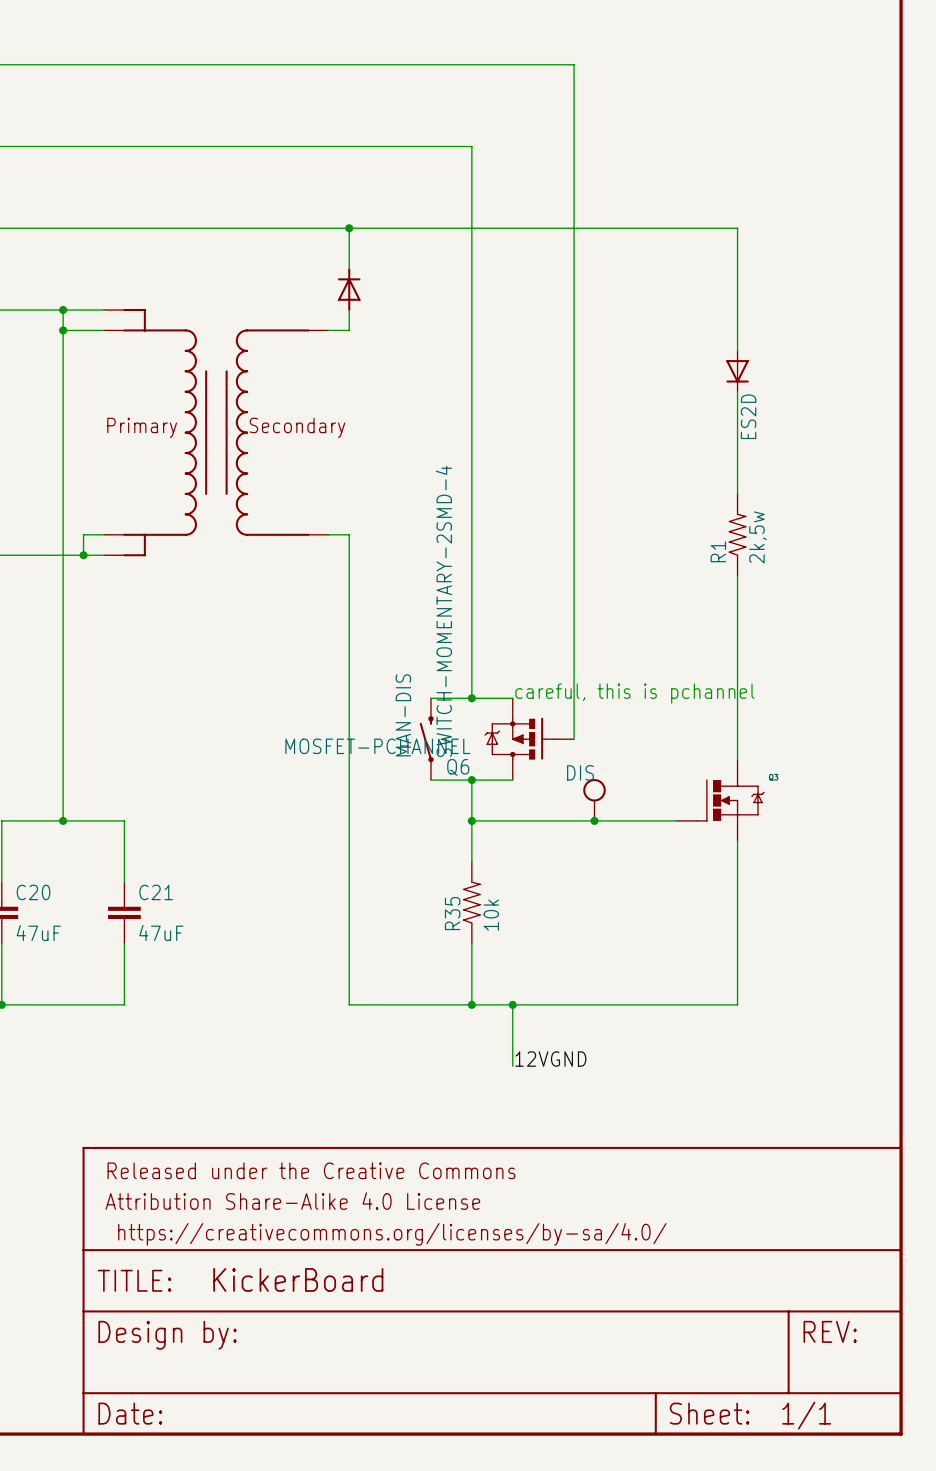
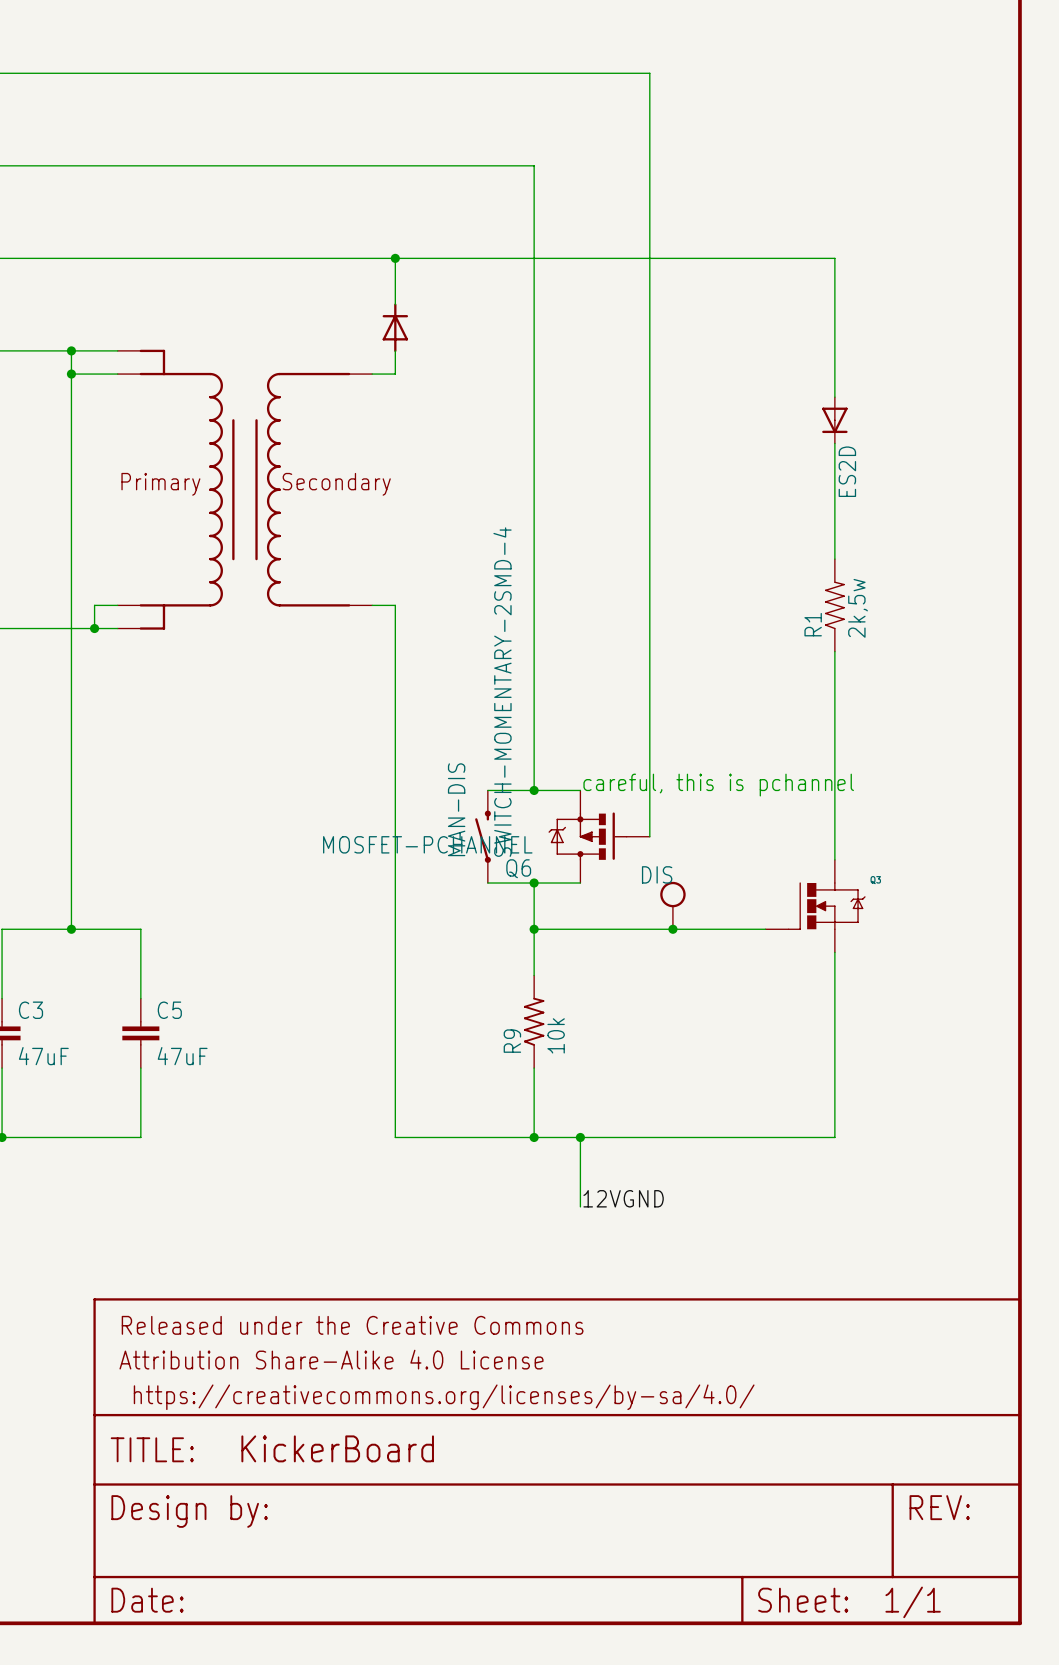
C20 name: C20 (33, 892) -> C3 (31, 1010)
C21 name: C21 (156, 892) -> C5 (169, 1010)
R35: 10k (471, 902) -> none
R9: none -> 10k (534, 1021)

